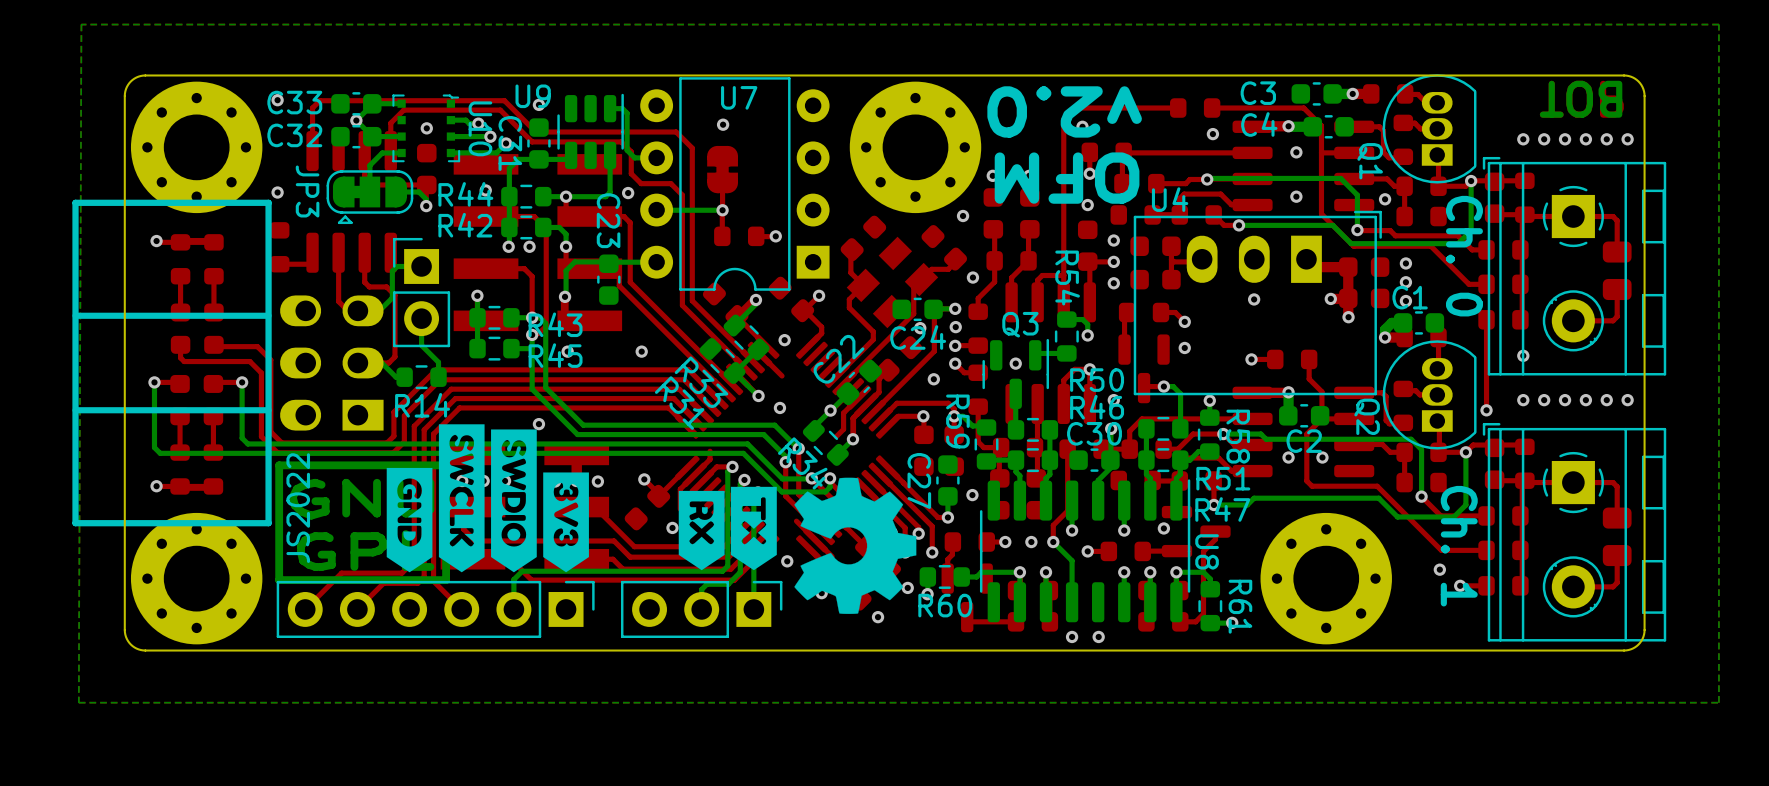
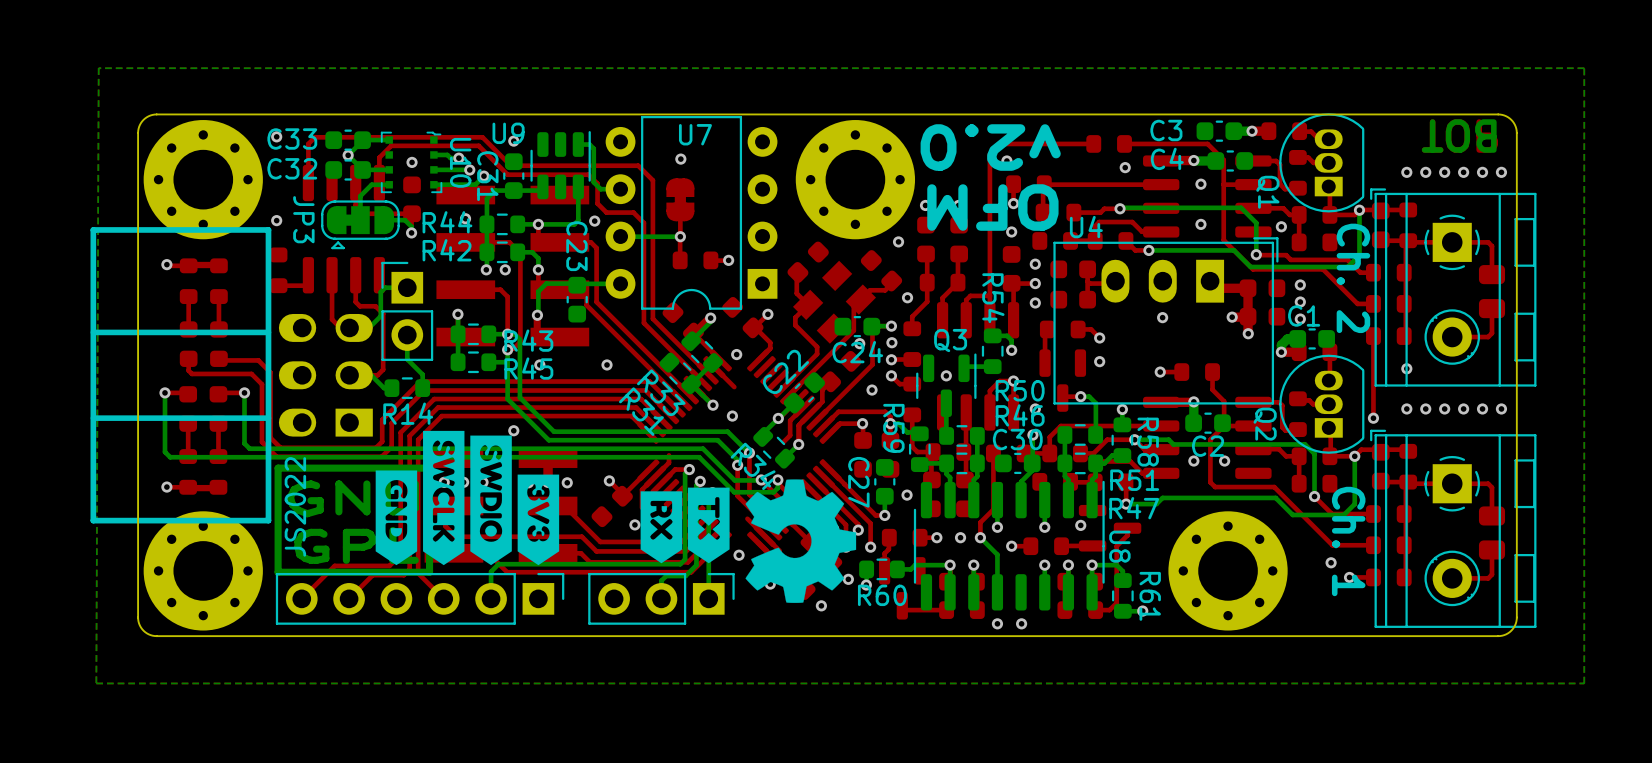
text: Ch. 0 (1464, 256) -> Ch. 2 (1353, 278)

